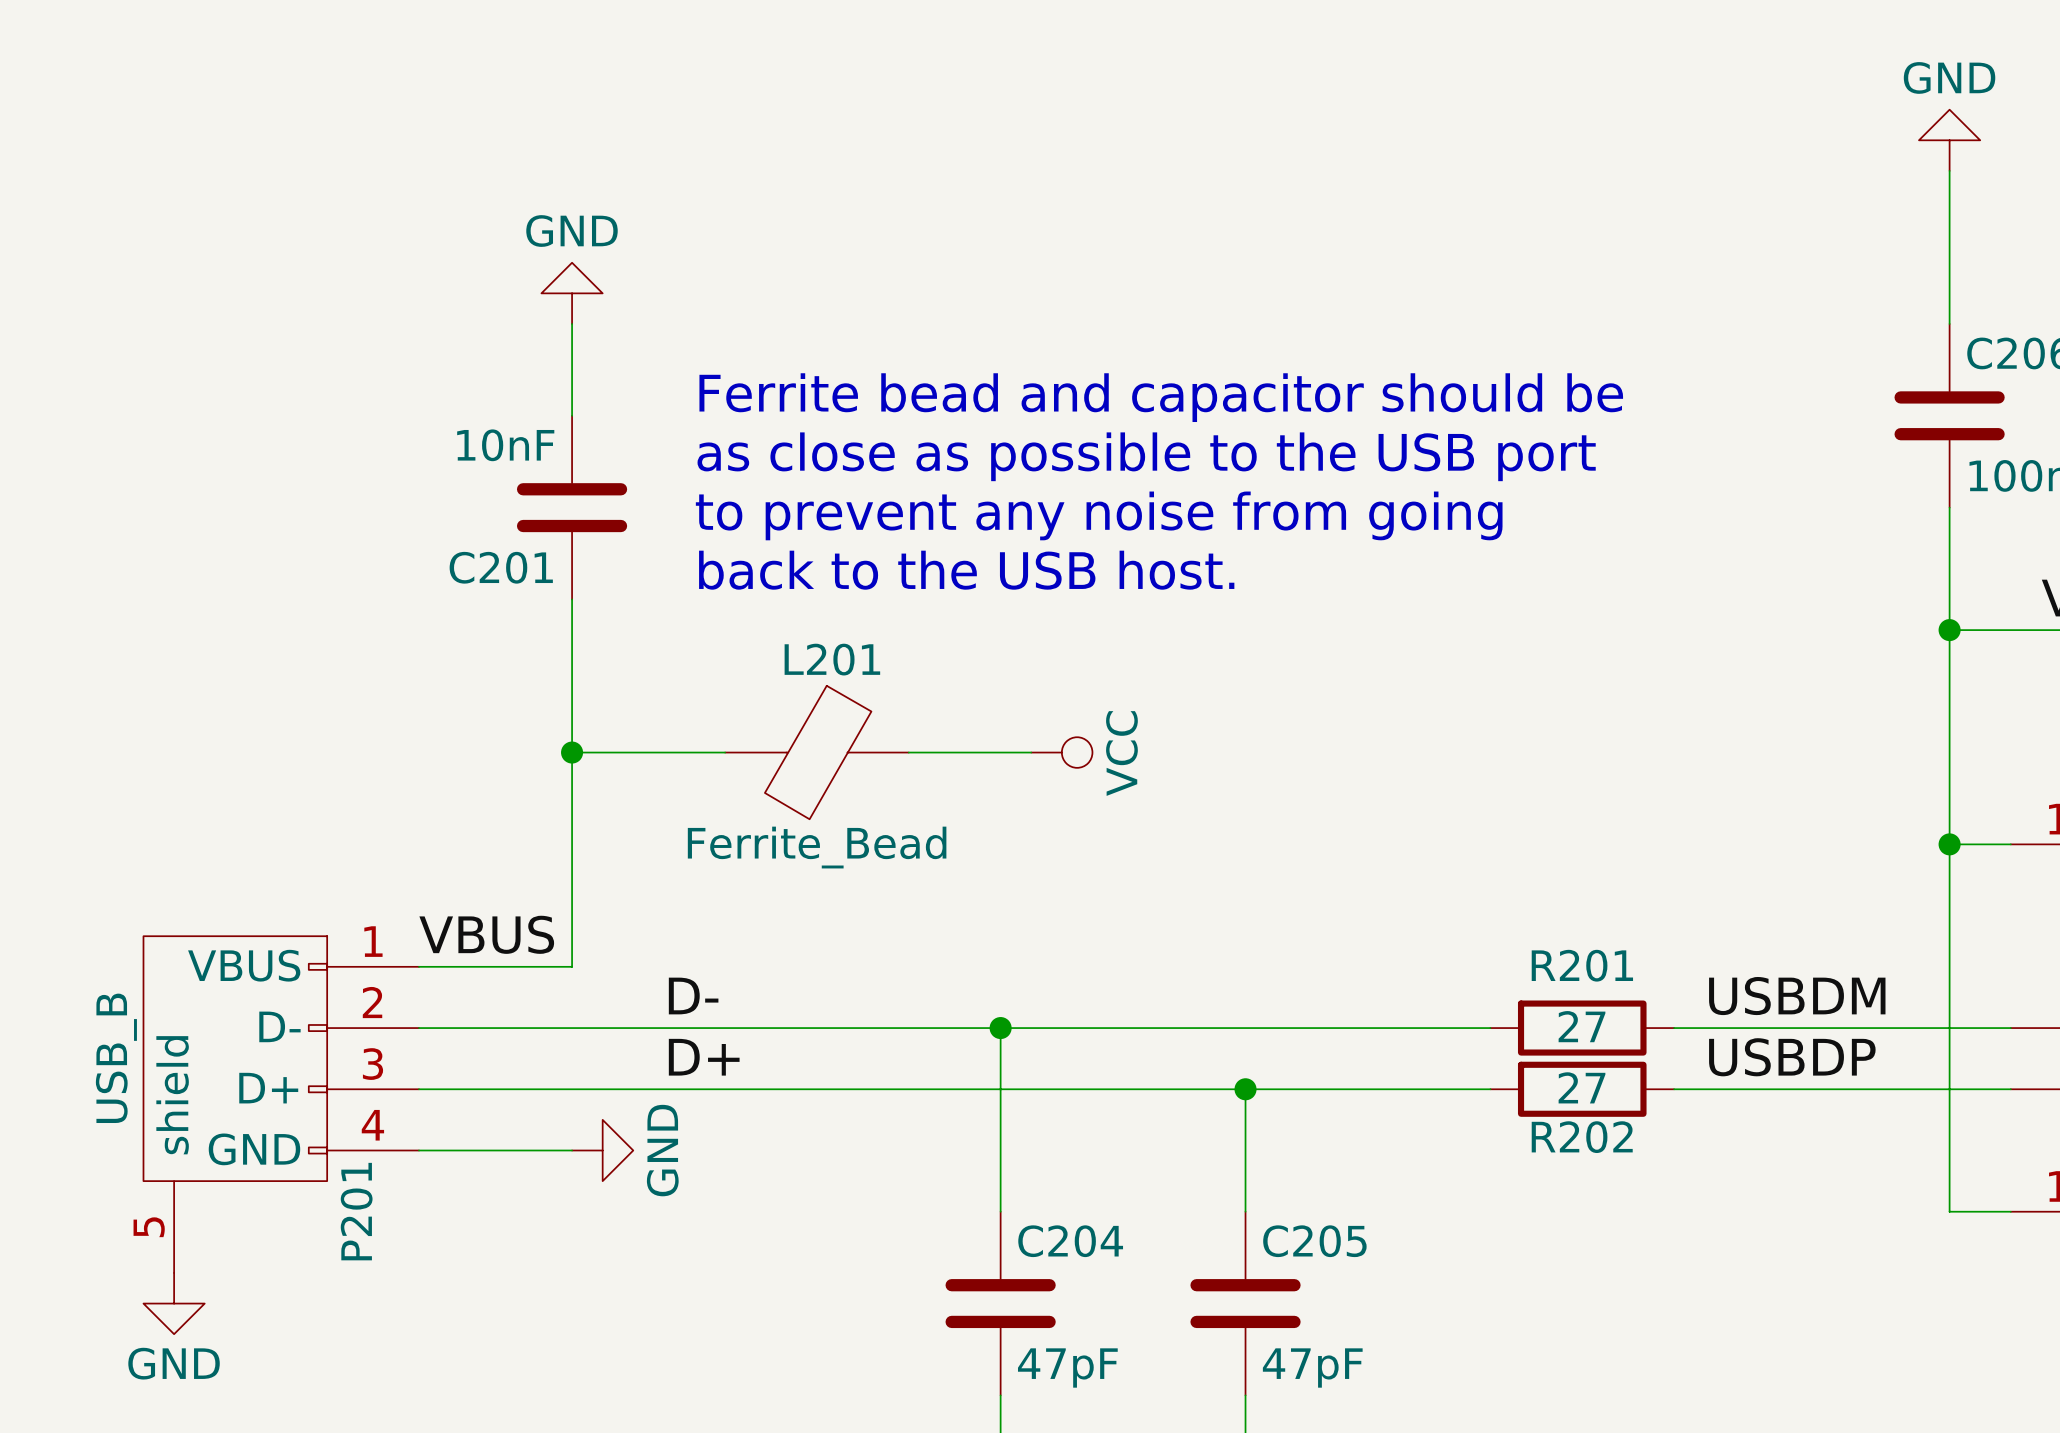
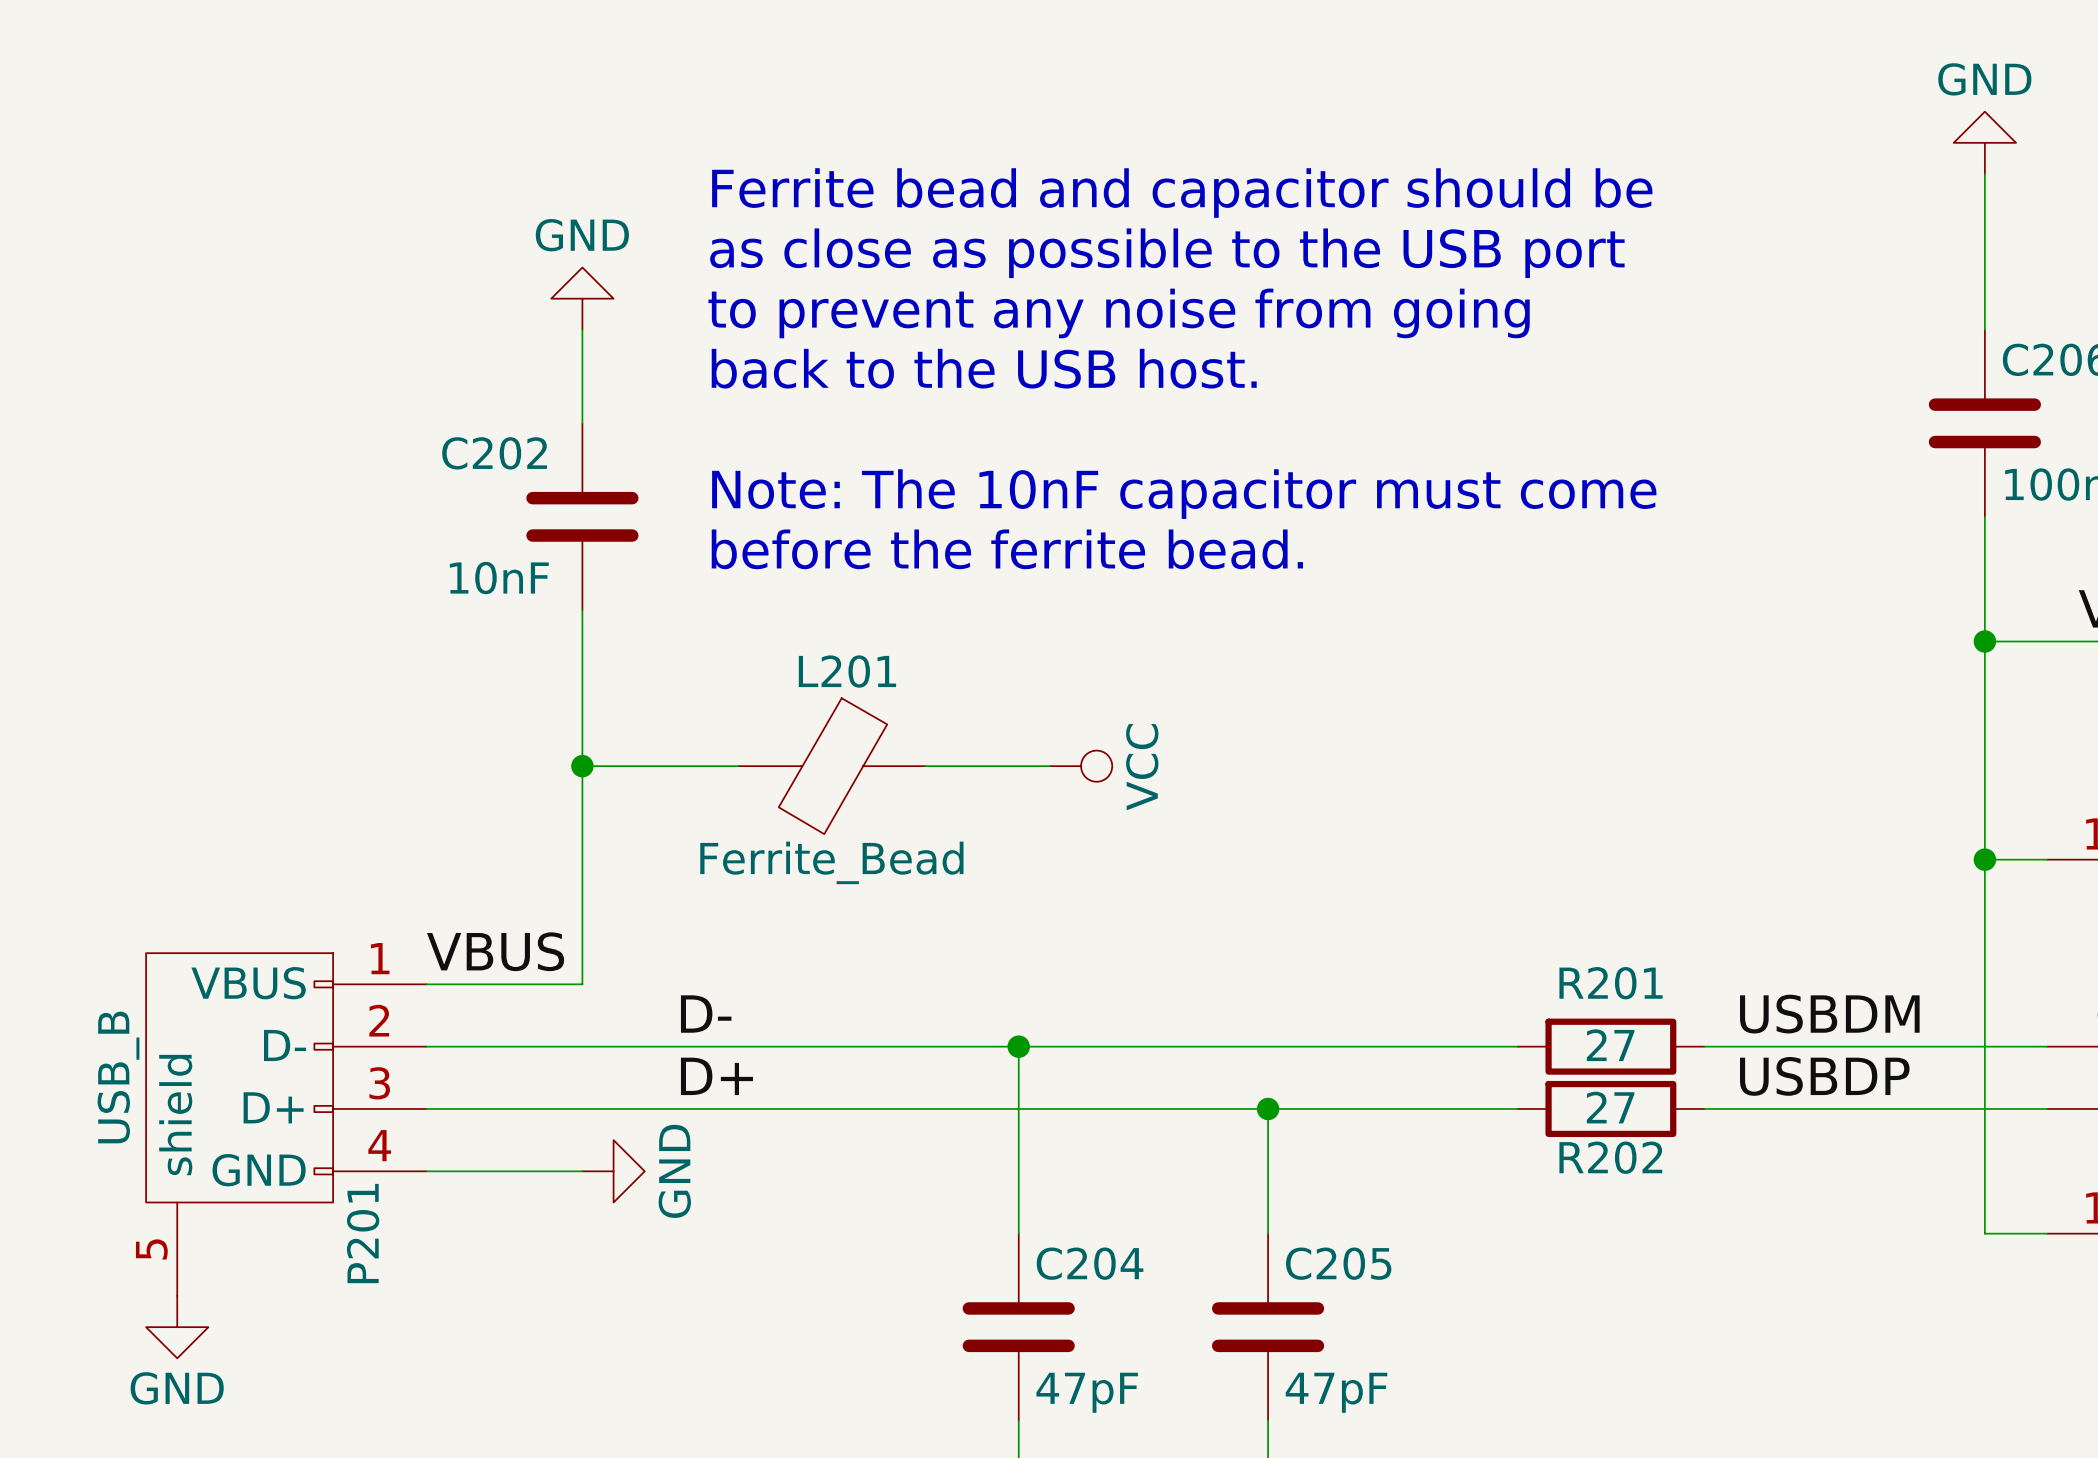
text position: Ferrite bead and capacitor should be (1161, 397) -> Ferrite bead and capacitor should be (1182, 193)
C201 value position: 10nF (505, 445) -> 10nF (499, 578)
text position: as close as possible to the USB port (1146, 456) -> as close as possible to the USB port (1167, 253)
text: none -> Note: The 10nF capacitor must come (1184, 494)
text position: to prevent any noise from going (1099, 515) -> to prevent any noise from going (1119, 313)
text: none -> before the ferrite bead. (1007, 549)
C201 name: C201 (501, 567) -> C202 (494, 453)
text position: back to the USB host. (966, 570) -> back to the USB host. (984, 368)

